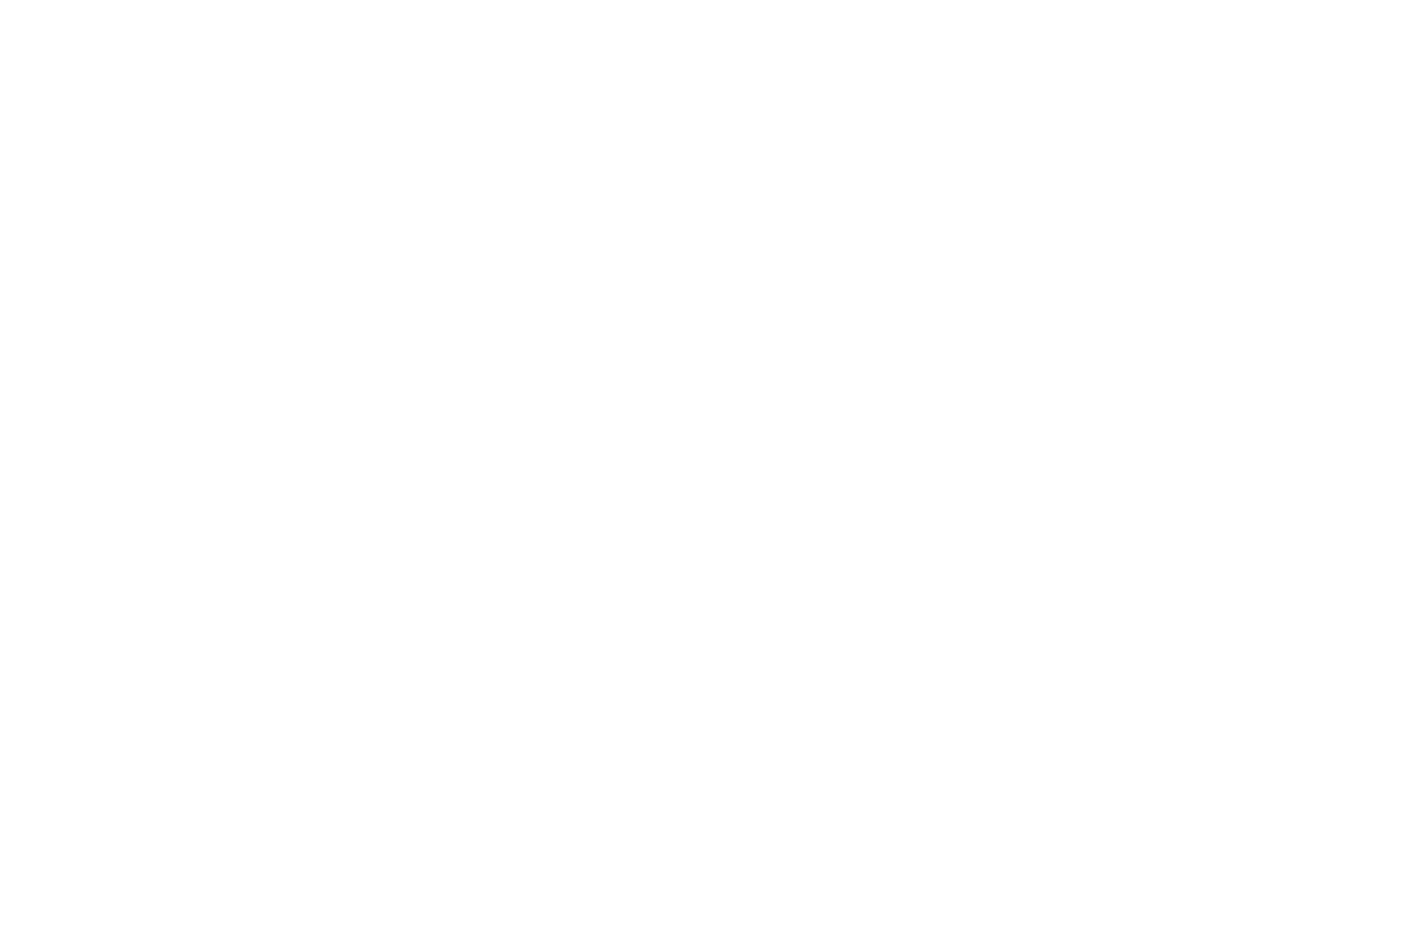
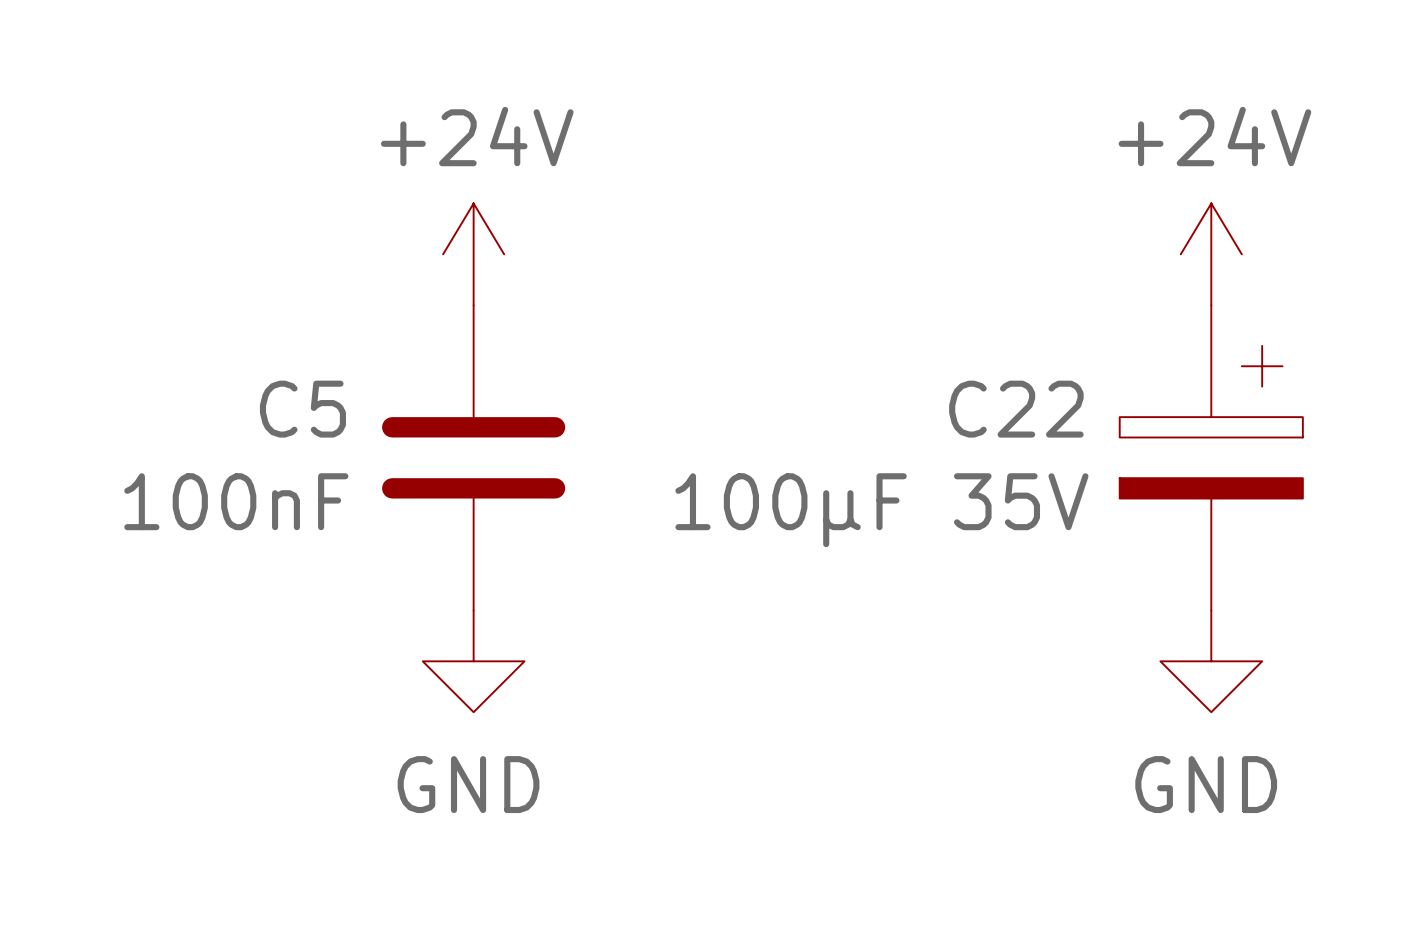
power symbol: none -> +24V (473, 254)
power symbol: none -> +24V (1211, 254)
C5: none -> 100nF (473, 457)
C22: none -> 100µF 35V (1211, 457)
power symbol: none -> GND (473, 661)
power symbol: none -> GND (1211, 661)

